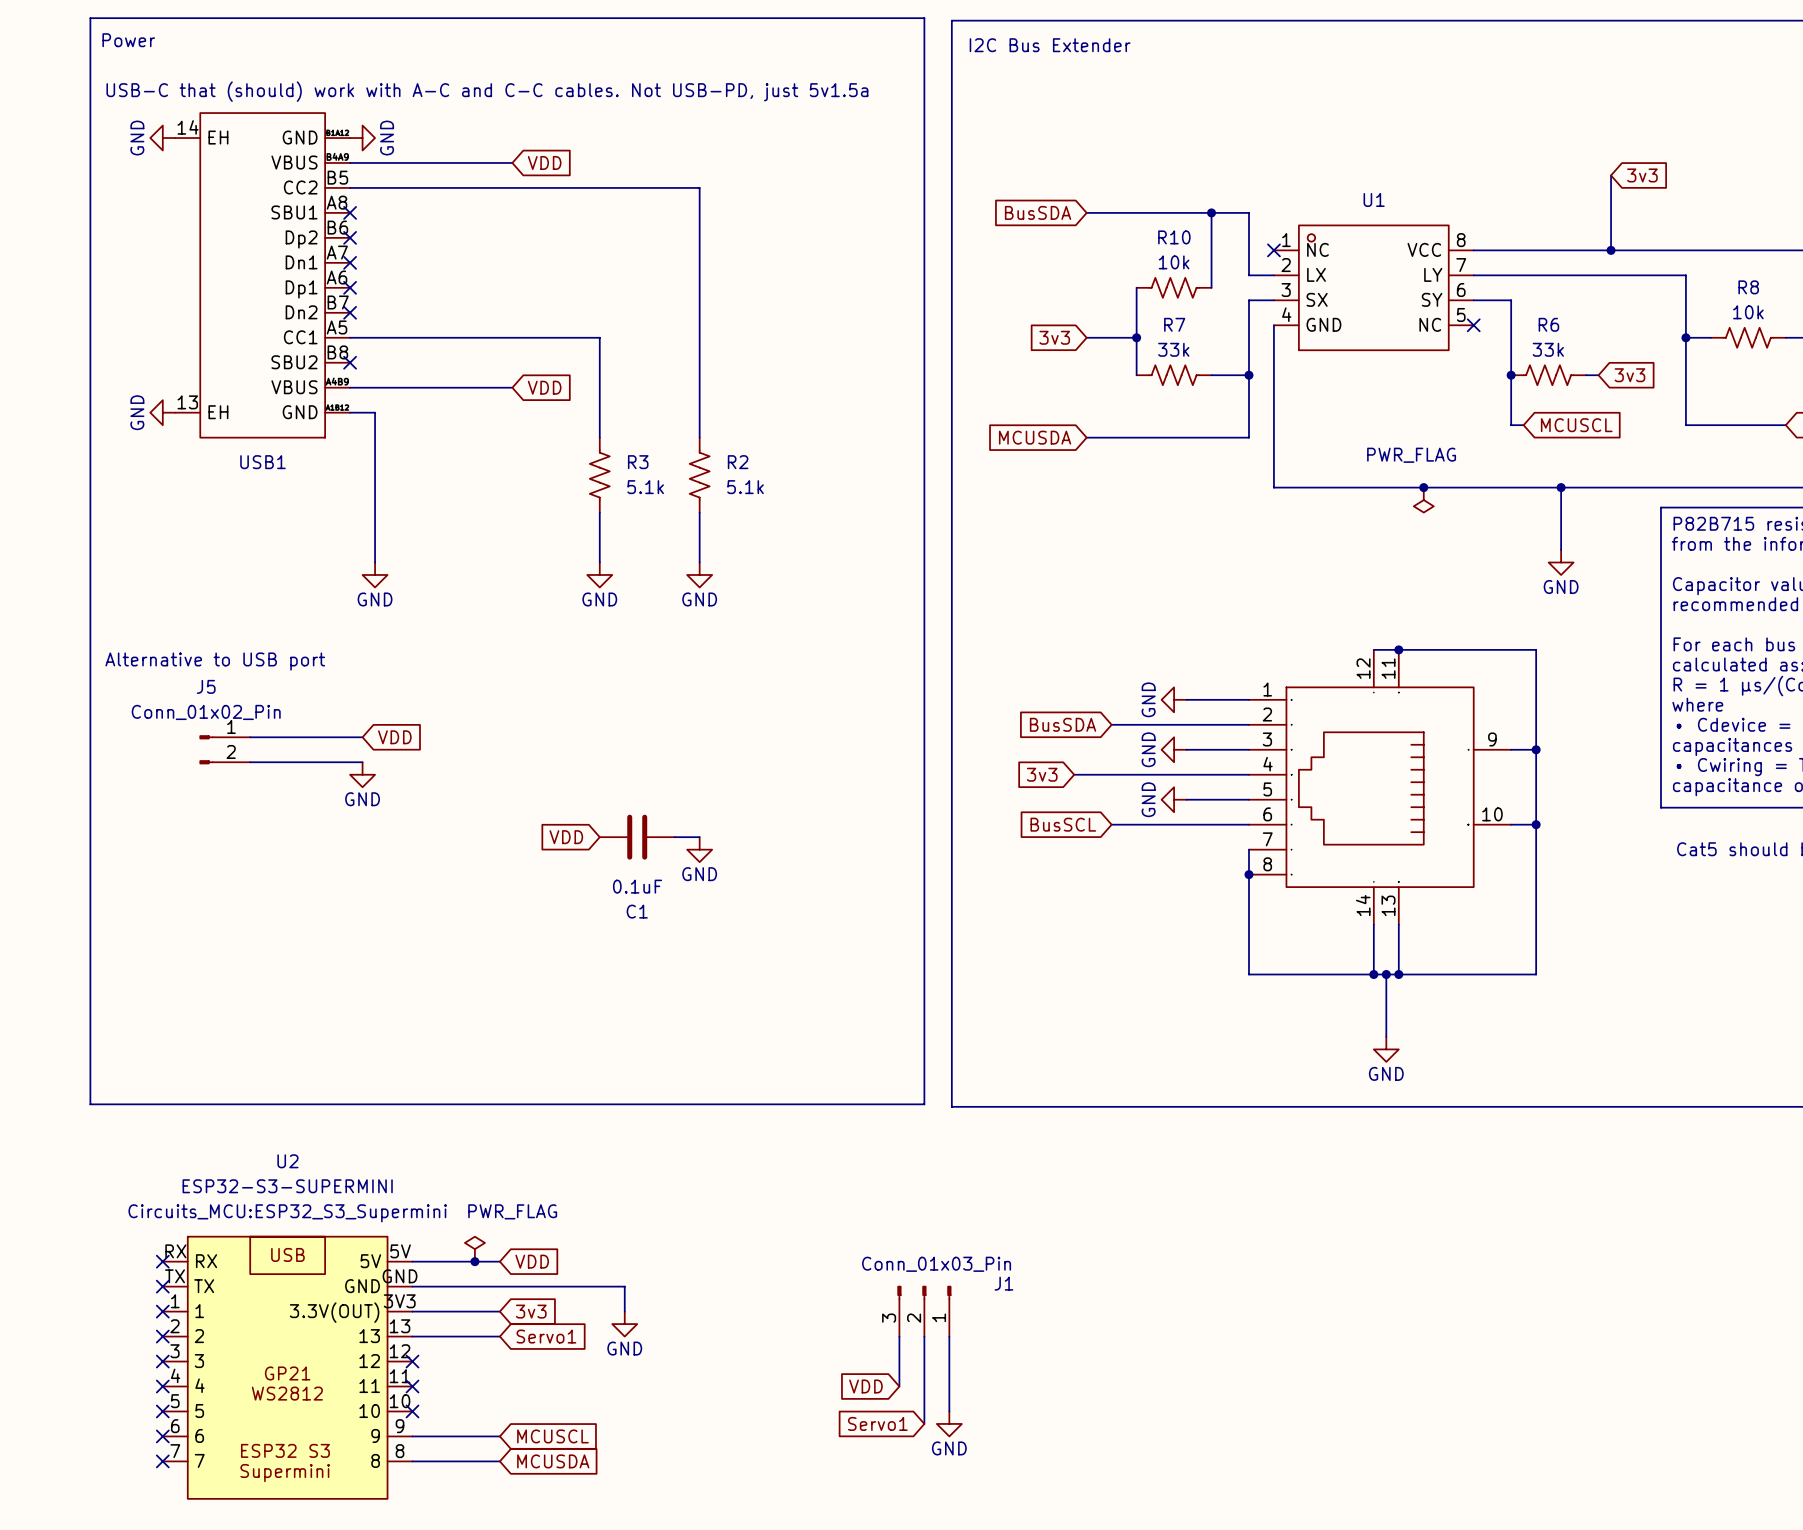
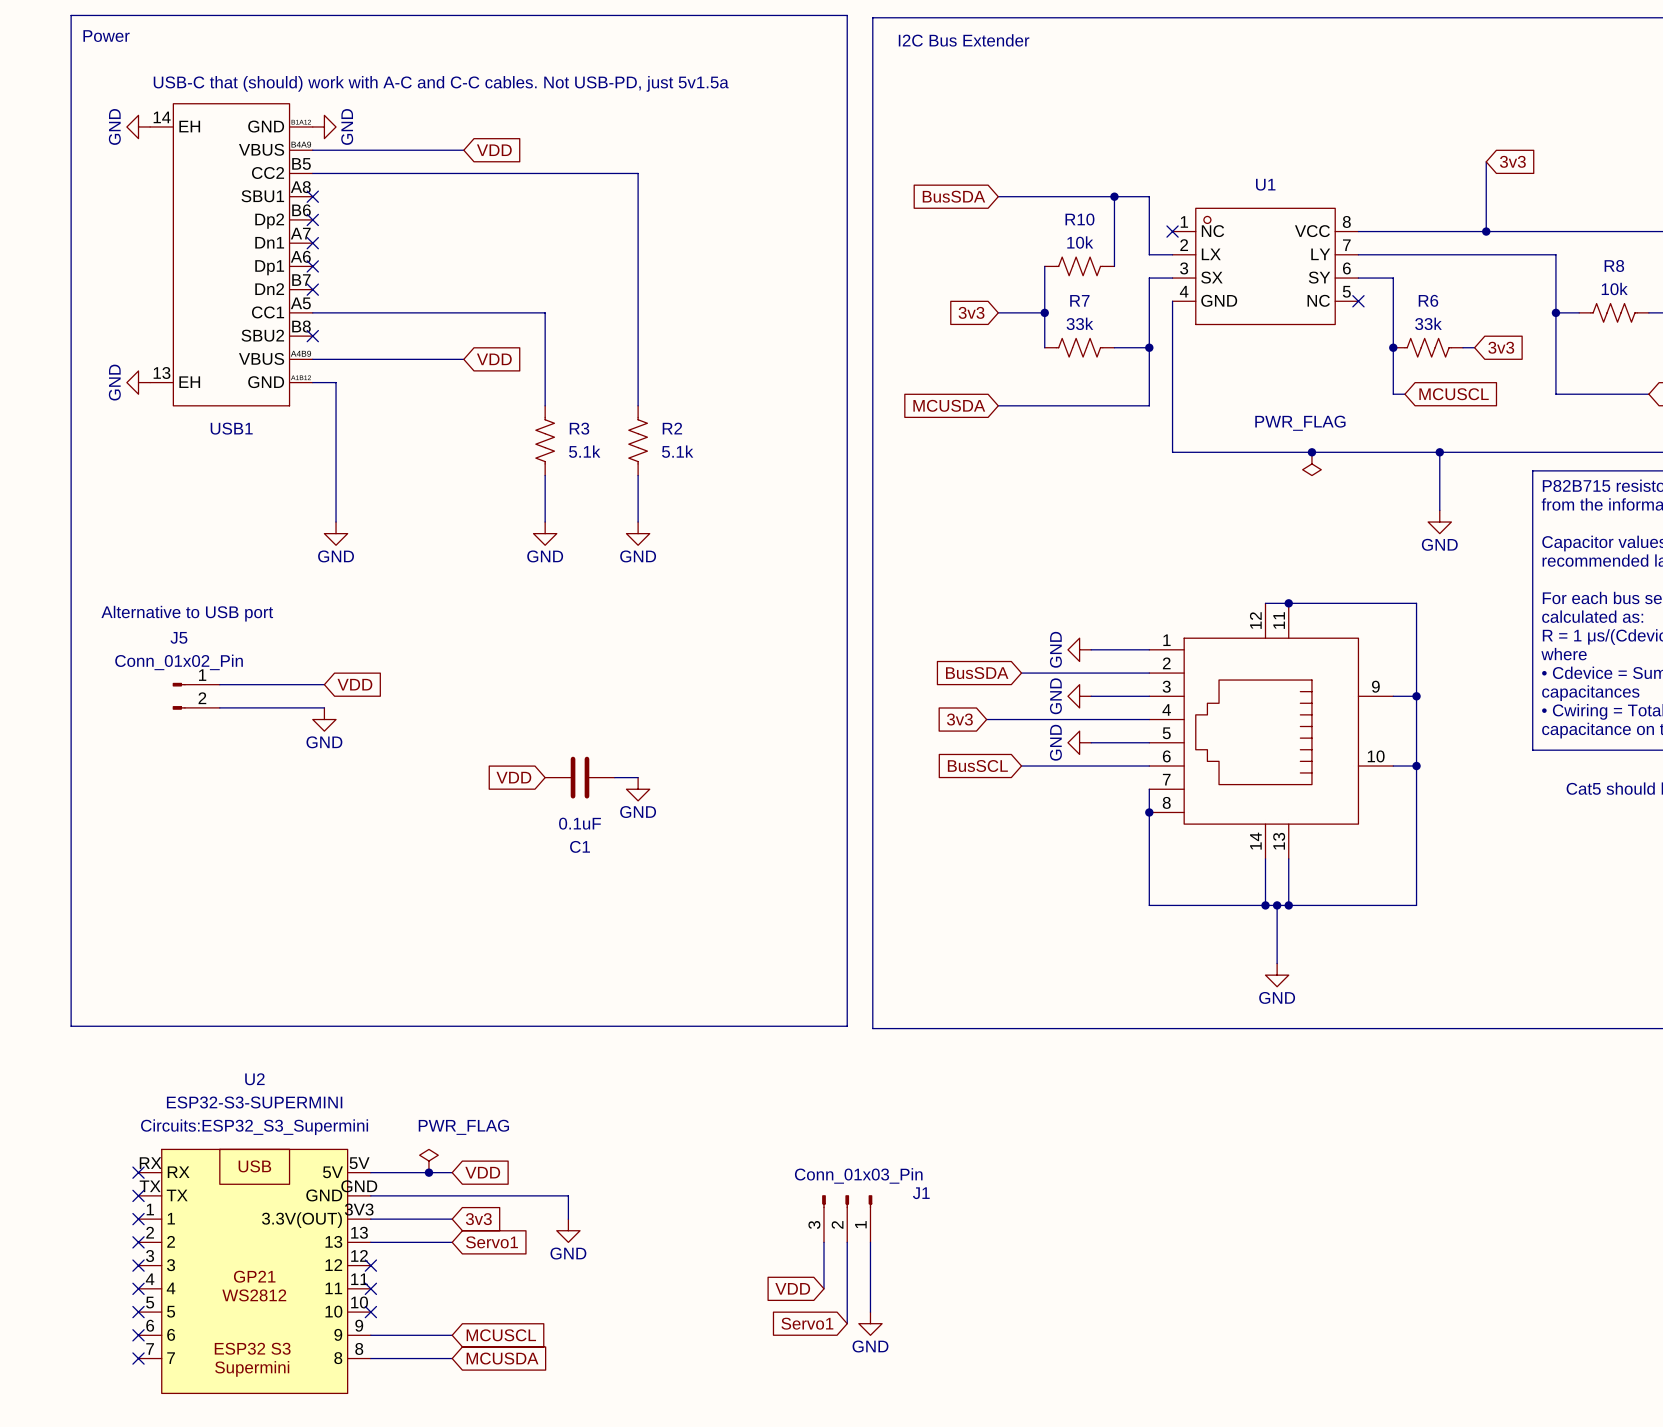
U2 text: Circuits_MCU:ESP32_S3_Supermini (287, 1213) -> Circuits:ESP32_S3_Supermini (254, 1127)

